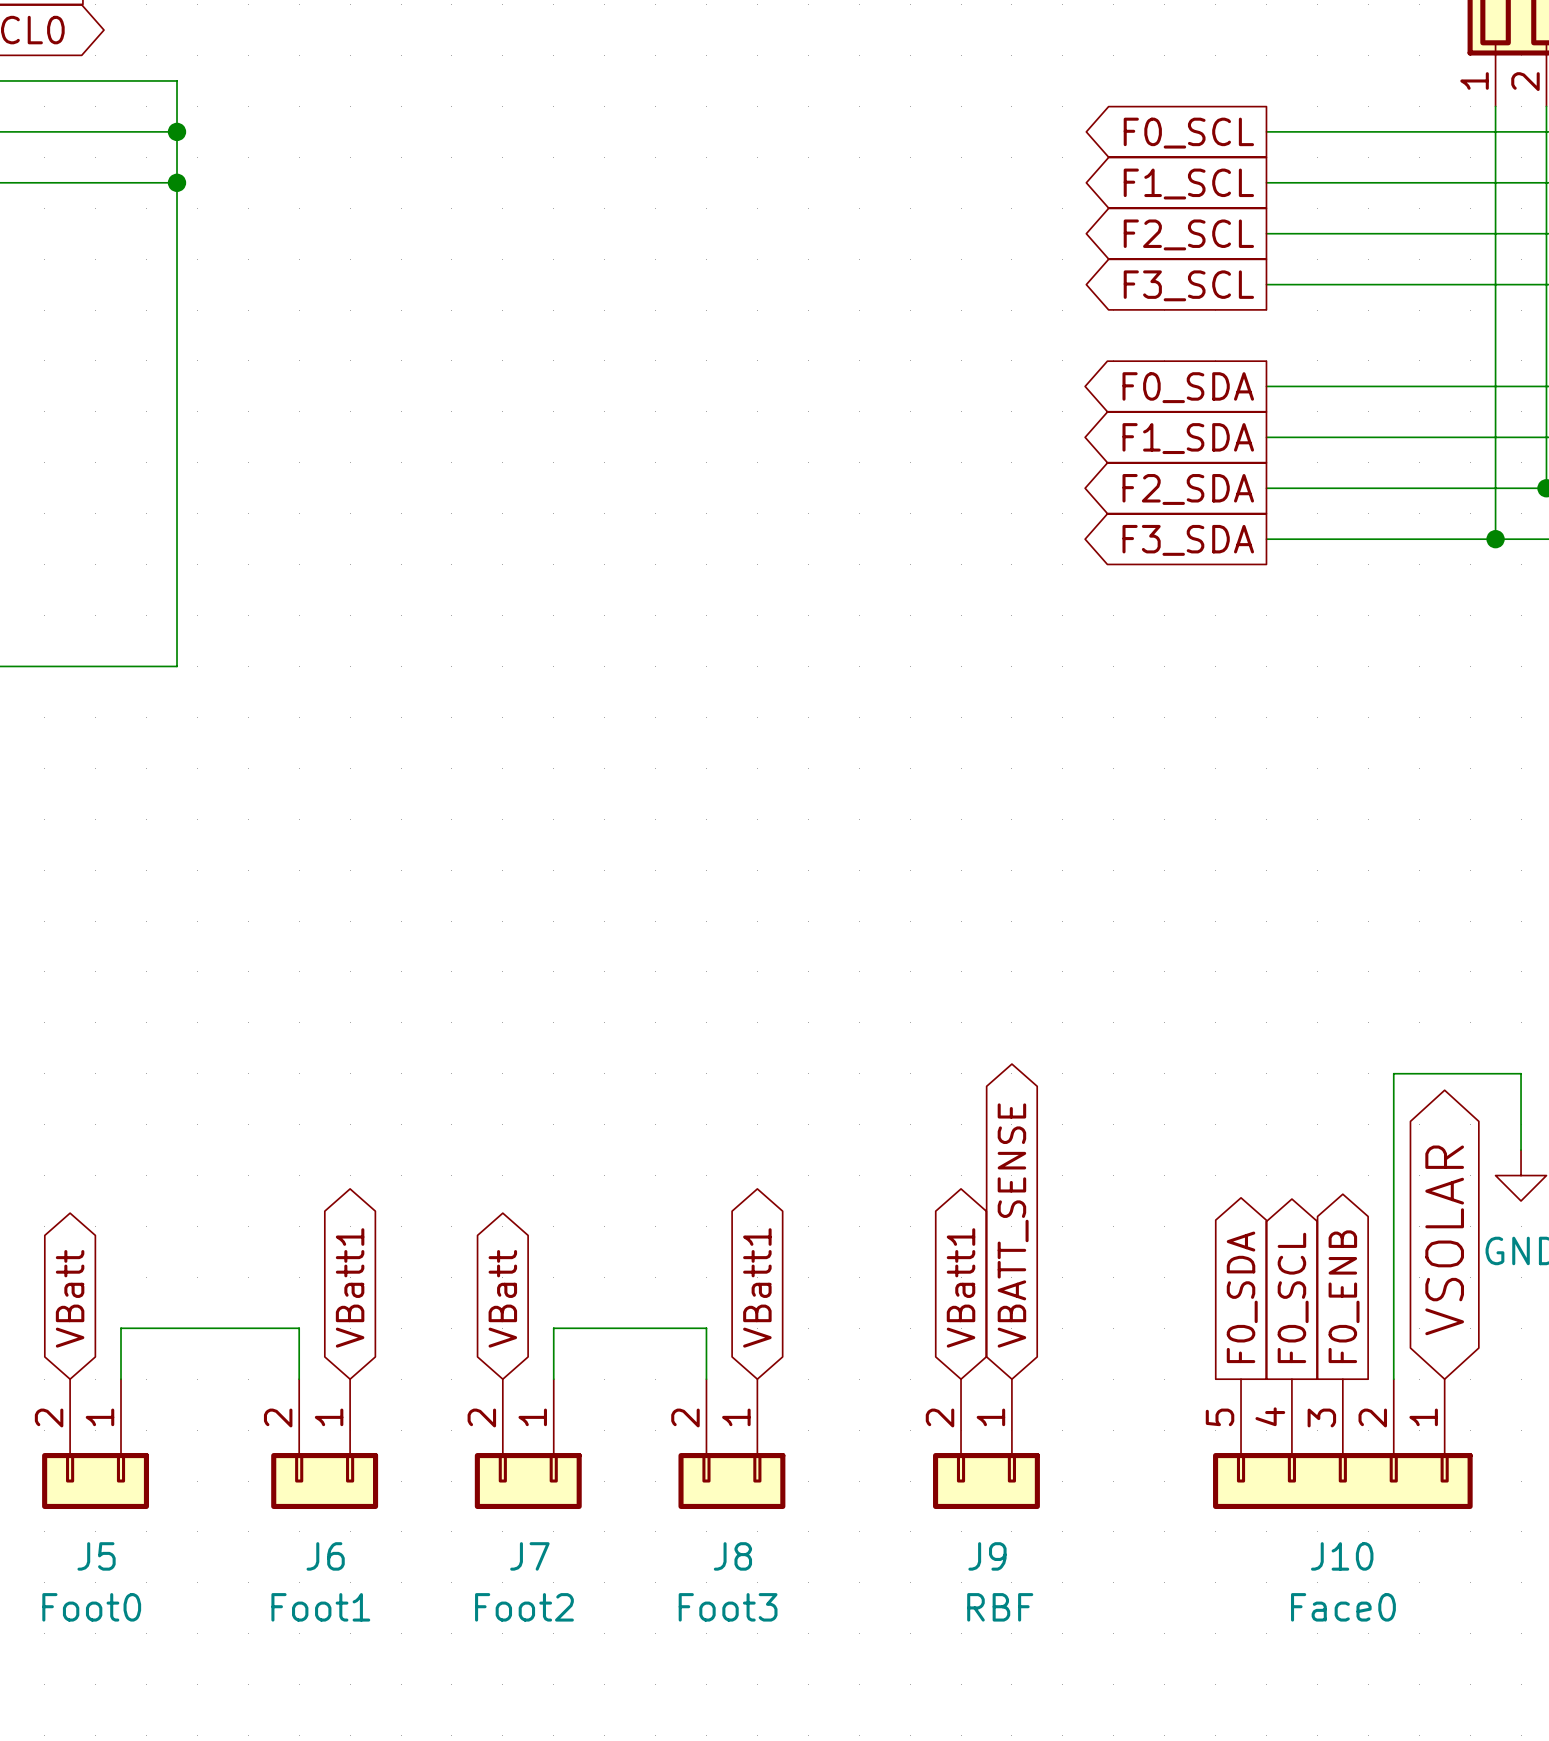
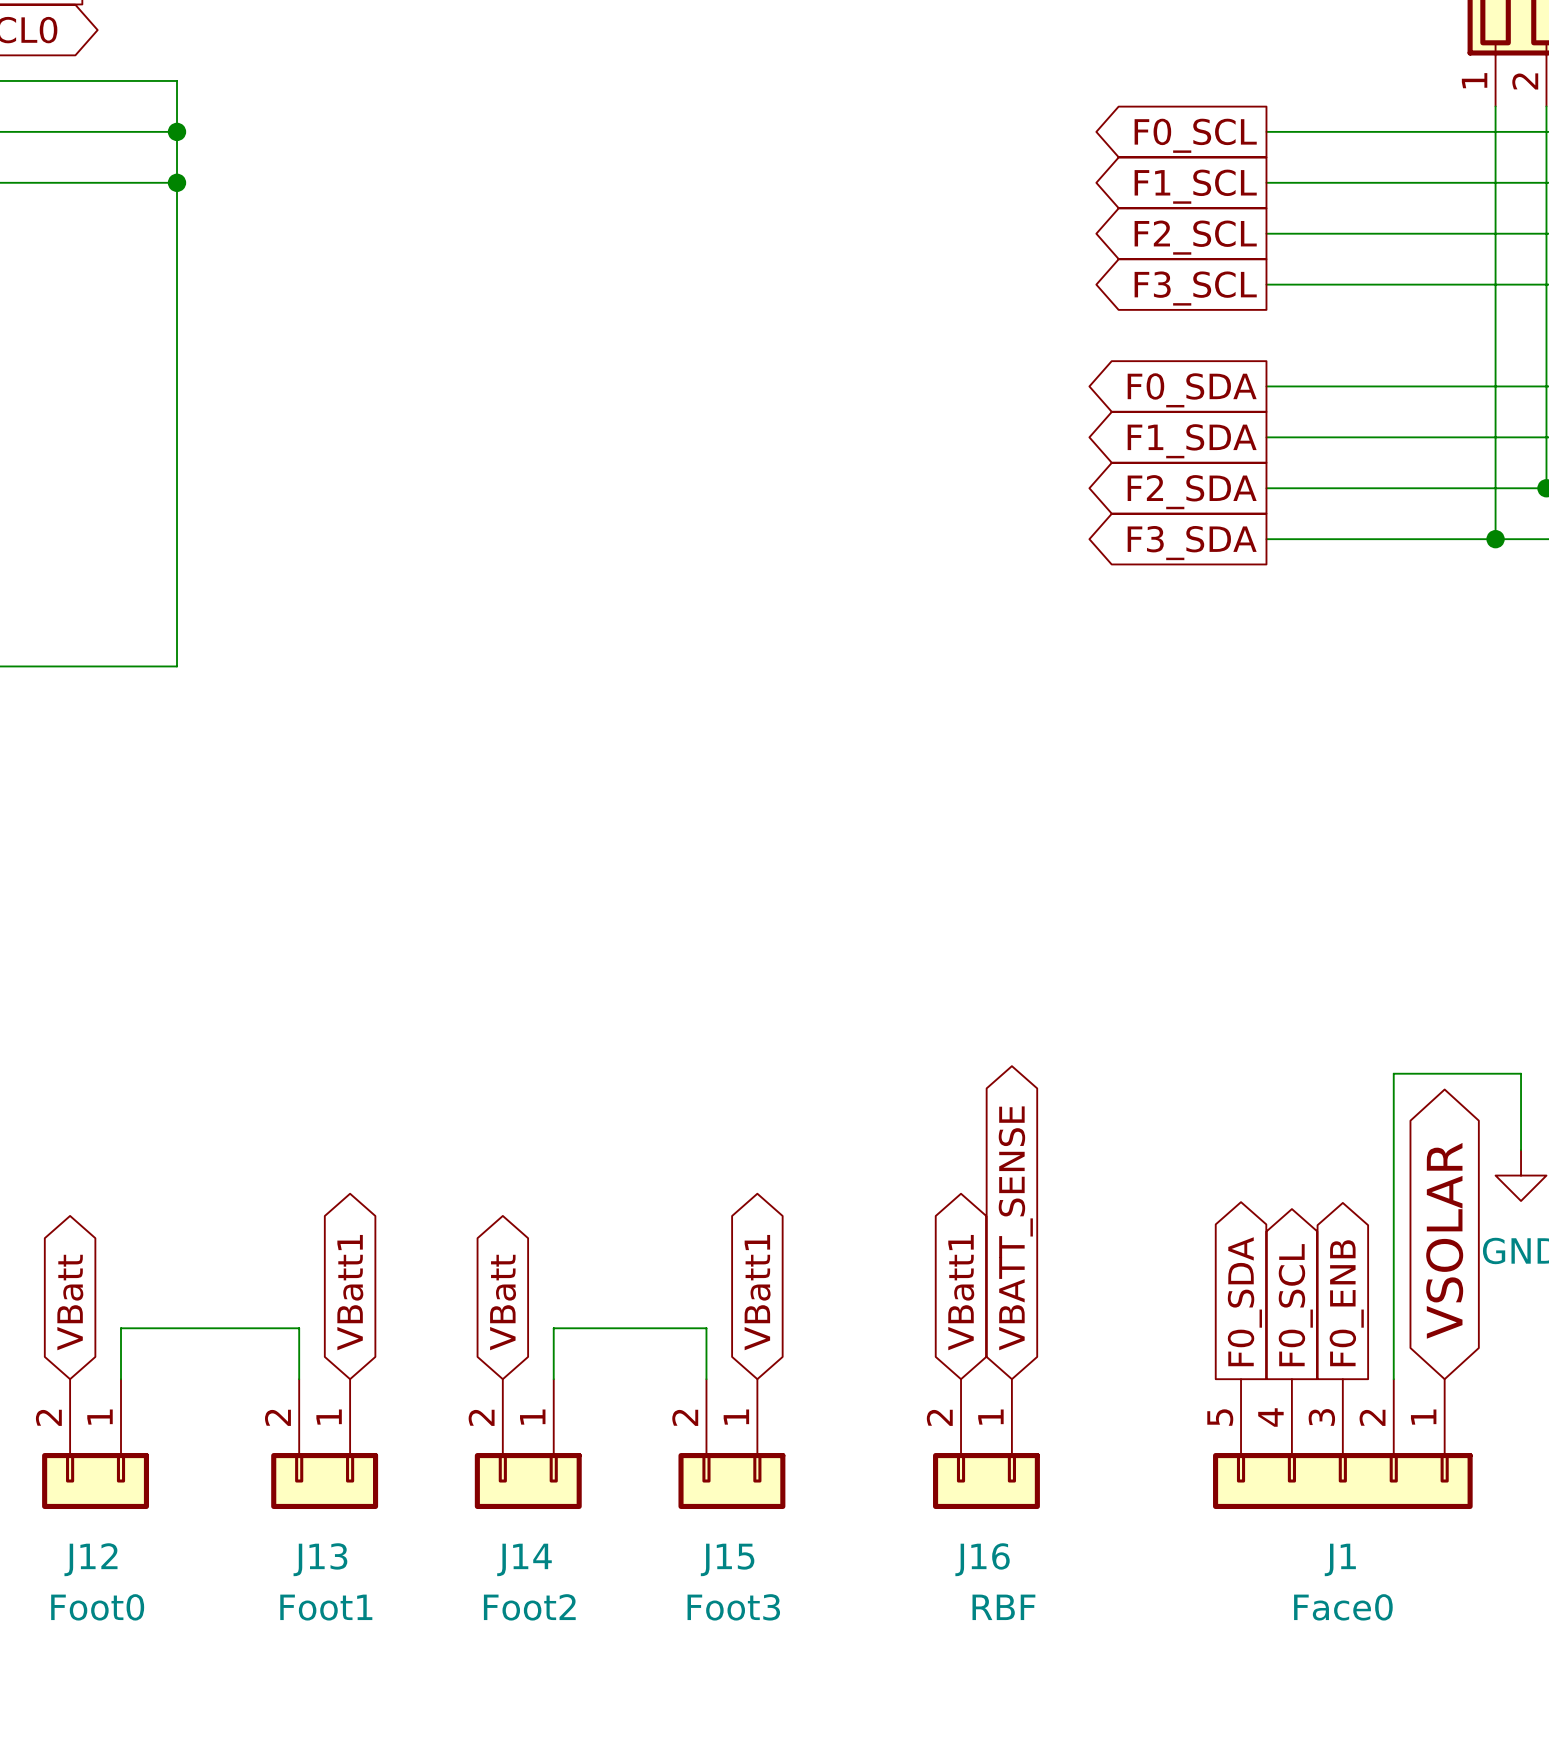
J5 name: J5 (96, 1556) -> J12 (90, 1559)
J6 name: J6 (325, 1556) -> J13 (320, 1559)
J7 name: J7 (529, 1556) -> J14 (524, 1559)
J8 name: J8 (732, 1556) -> J15 (727, 1559)
J9 name: J9 (987, 1556) -> J16 (982, 1559)
J10 name: J10 (1342, 1556) -> J1 (1340, 1559)

